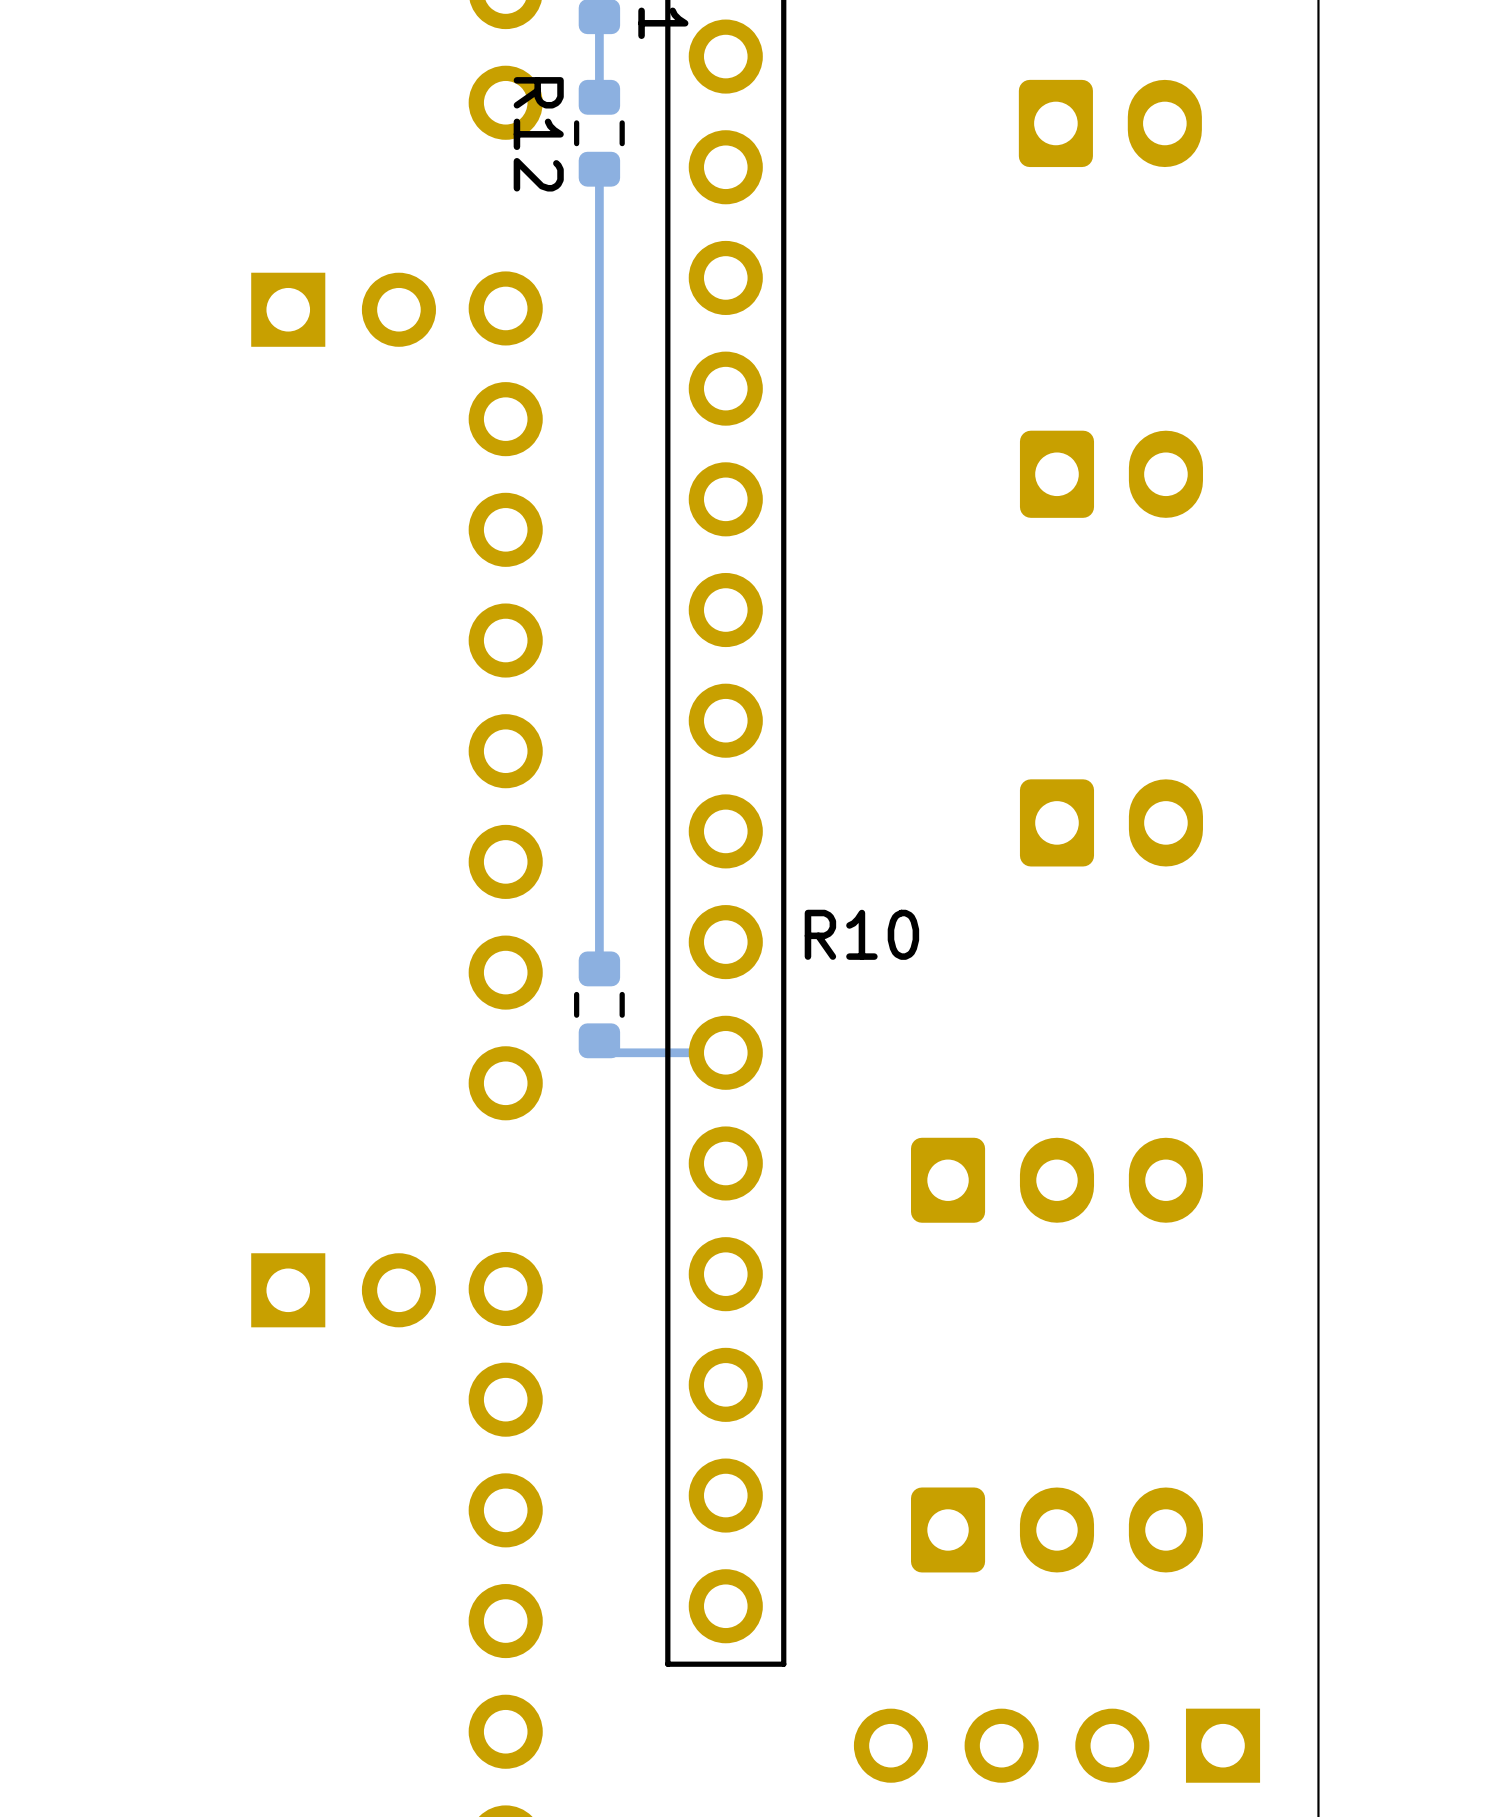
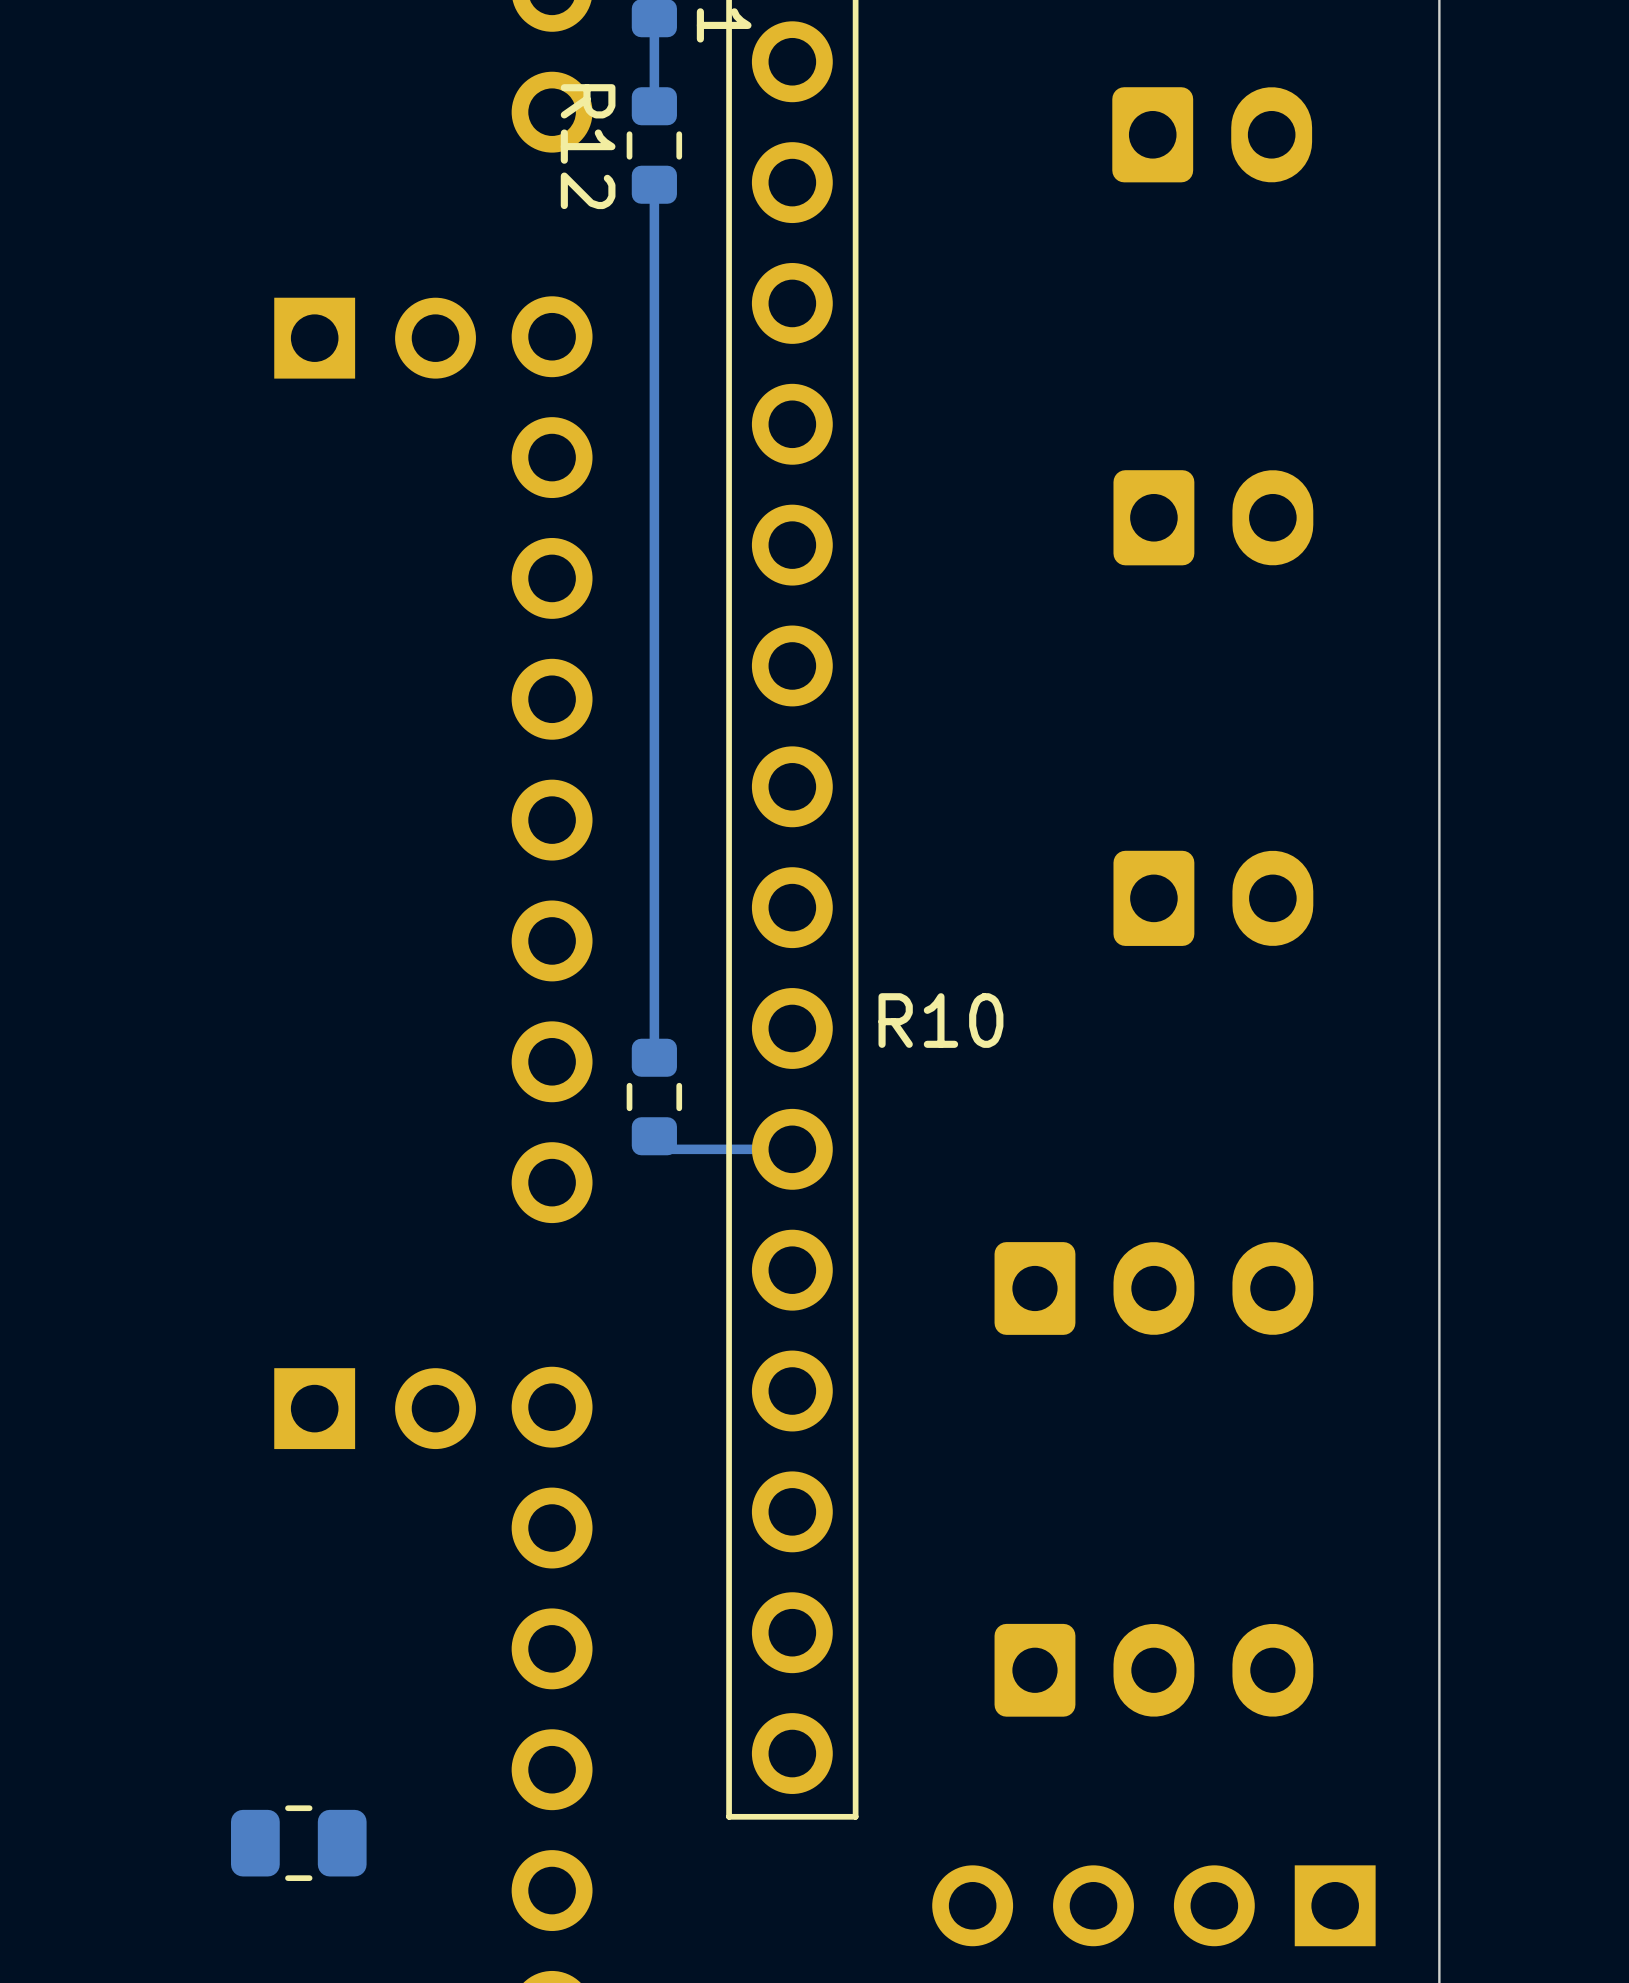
part: none -> (298, 1843)

